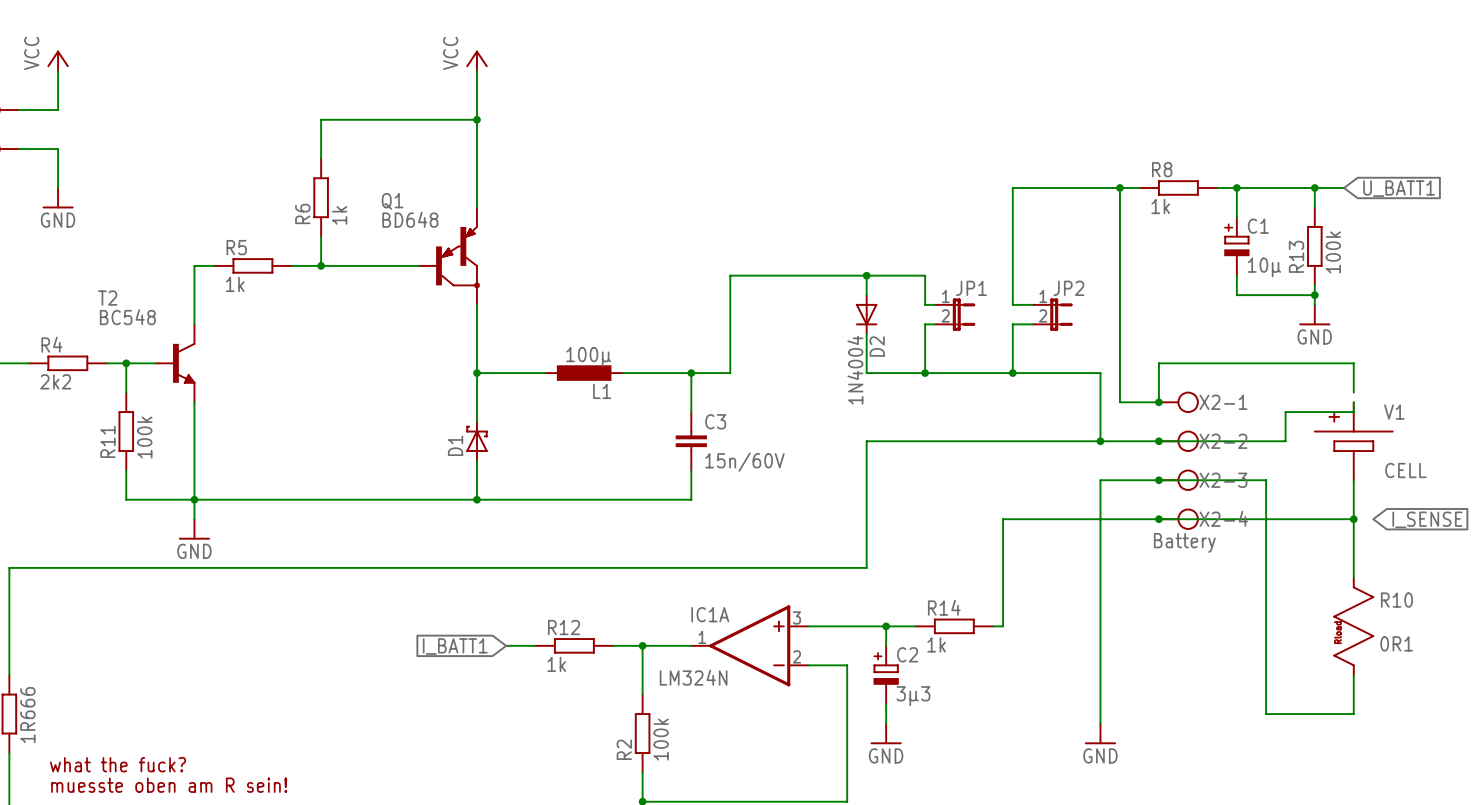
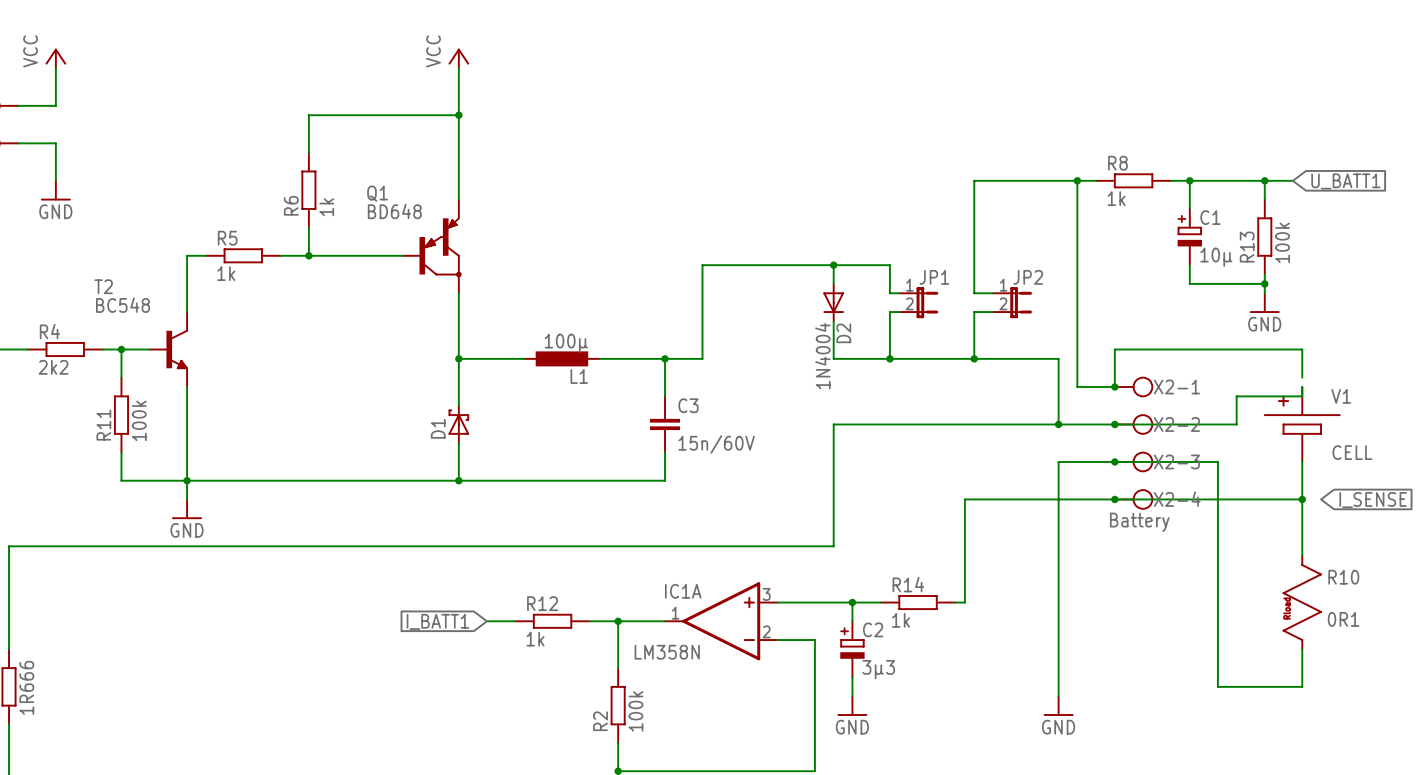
IC1A value: LM324N (693, 677) -> LM358N (667, 652)
text: what the fuck? (118, 764) -> none
text: muesste oben am R sein! (169, 785) -> none

